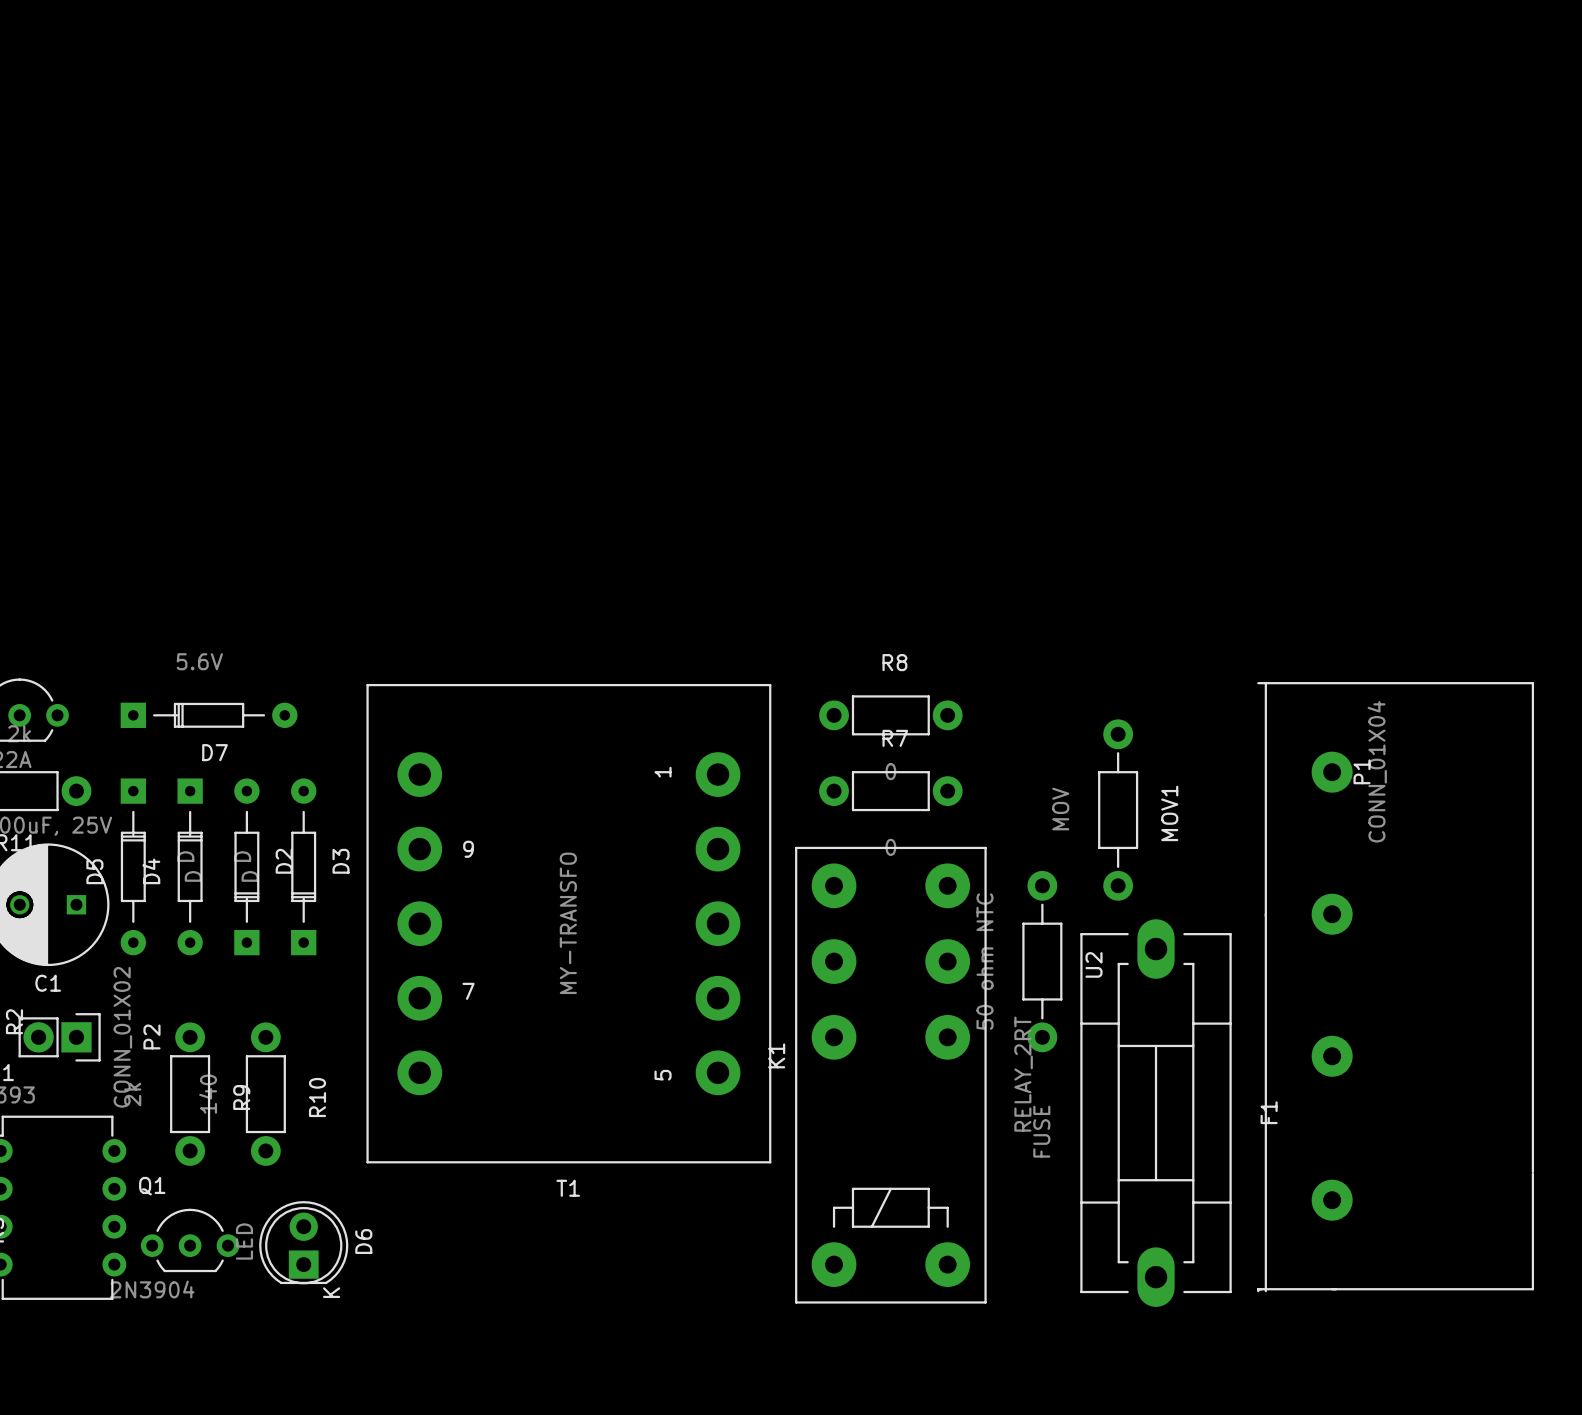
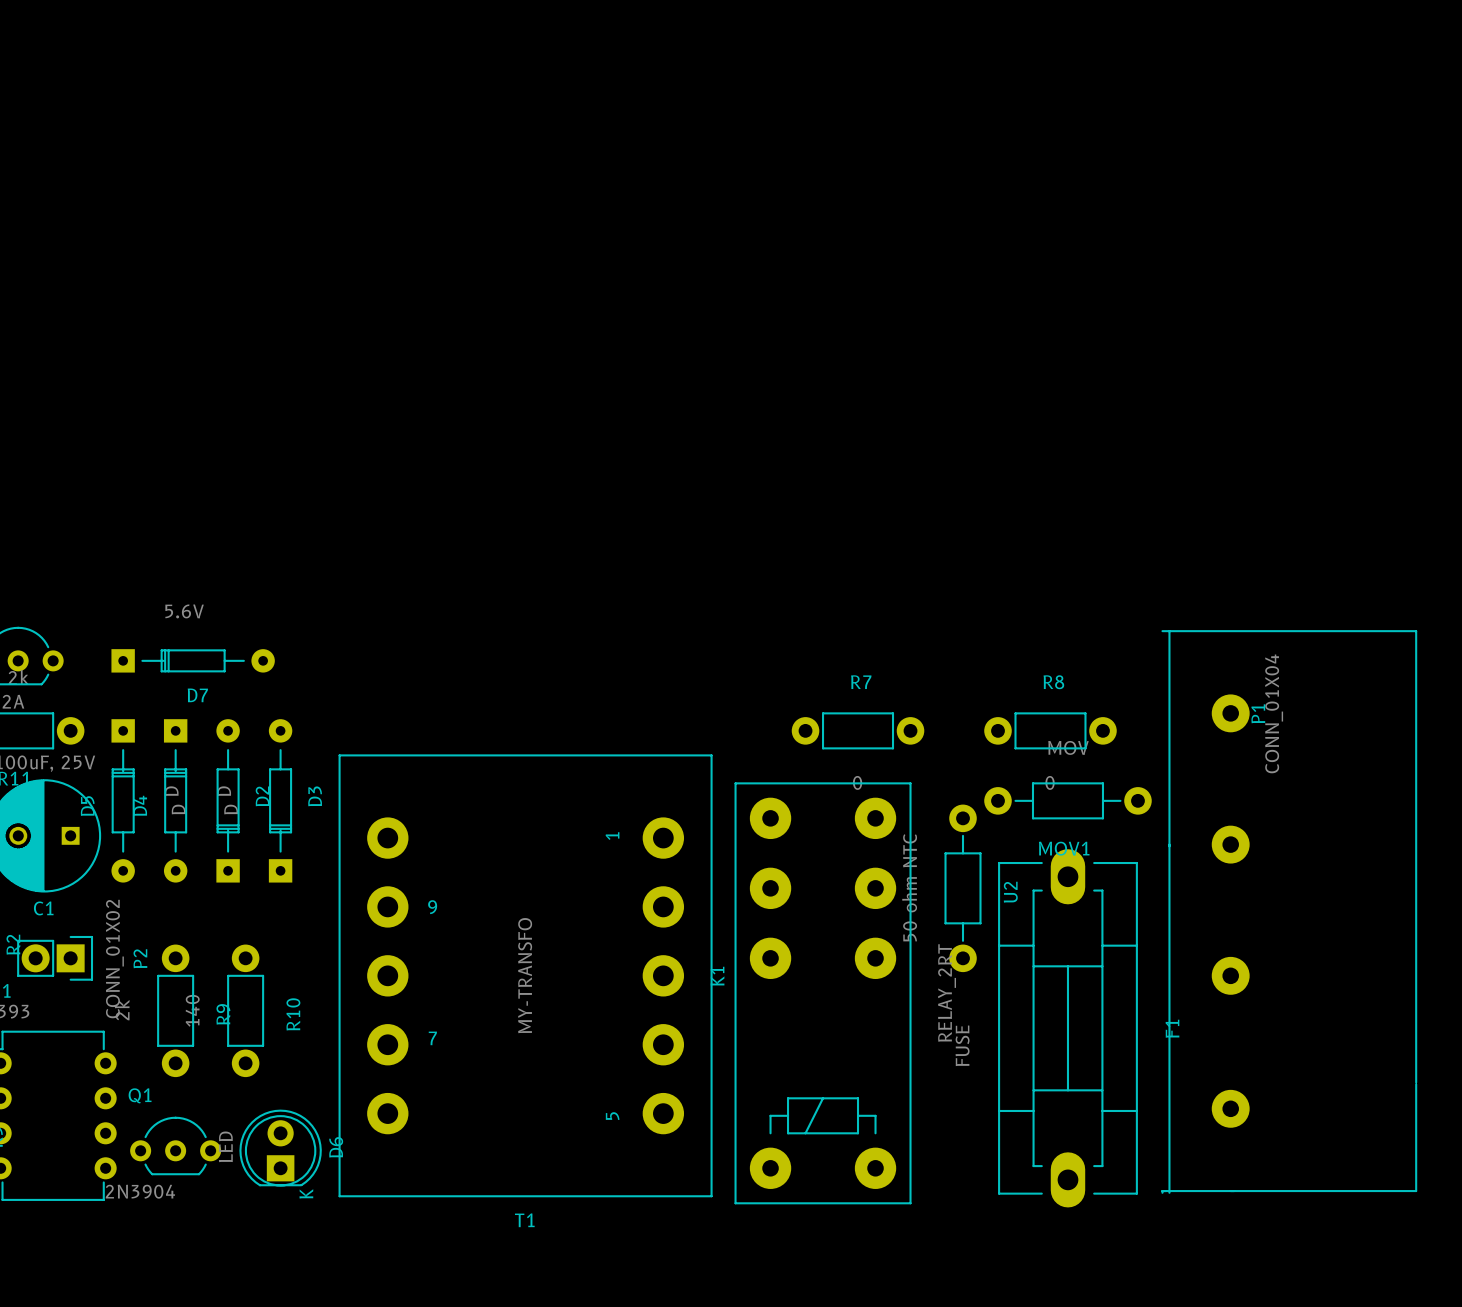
R8 position: (890, 715) -> (1050, 730)
R7 position: (890, 791) -> (858, 730)
MOV1 rotation: 0° (1118, 810) -> 90° clockwise (1067, 800)
T1 position: (568, 923) -> (525, 975)

